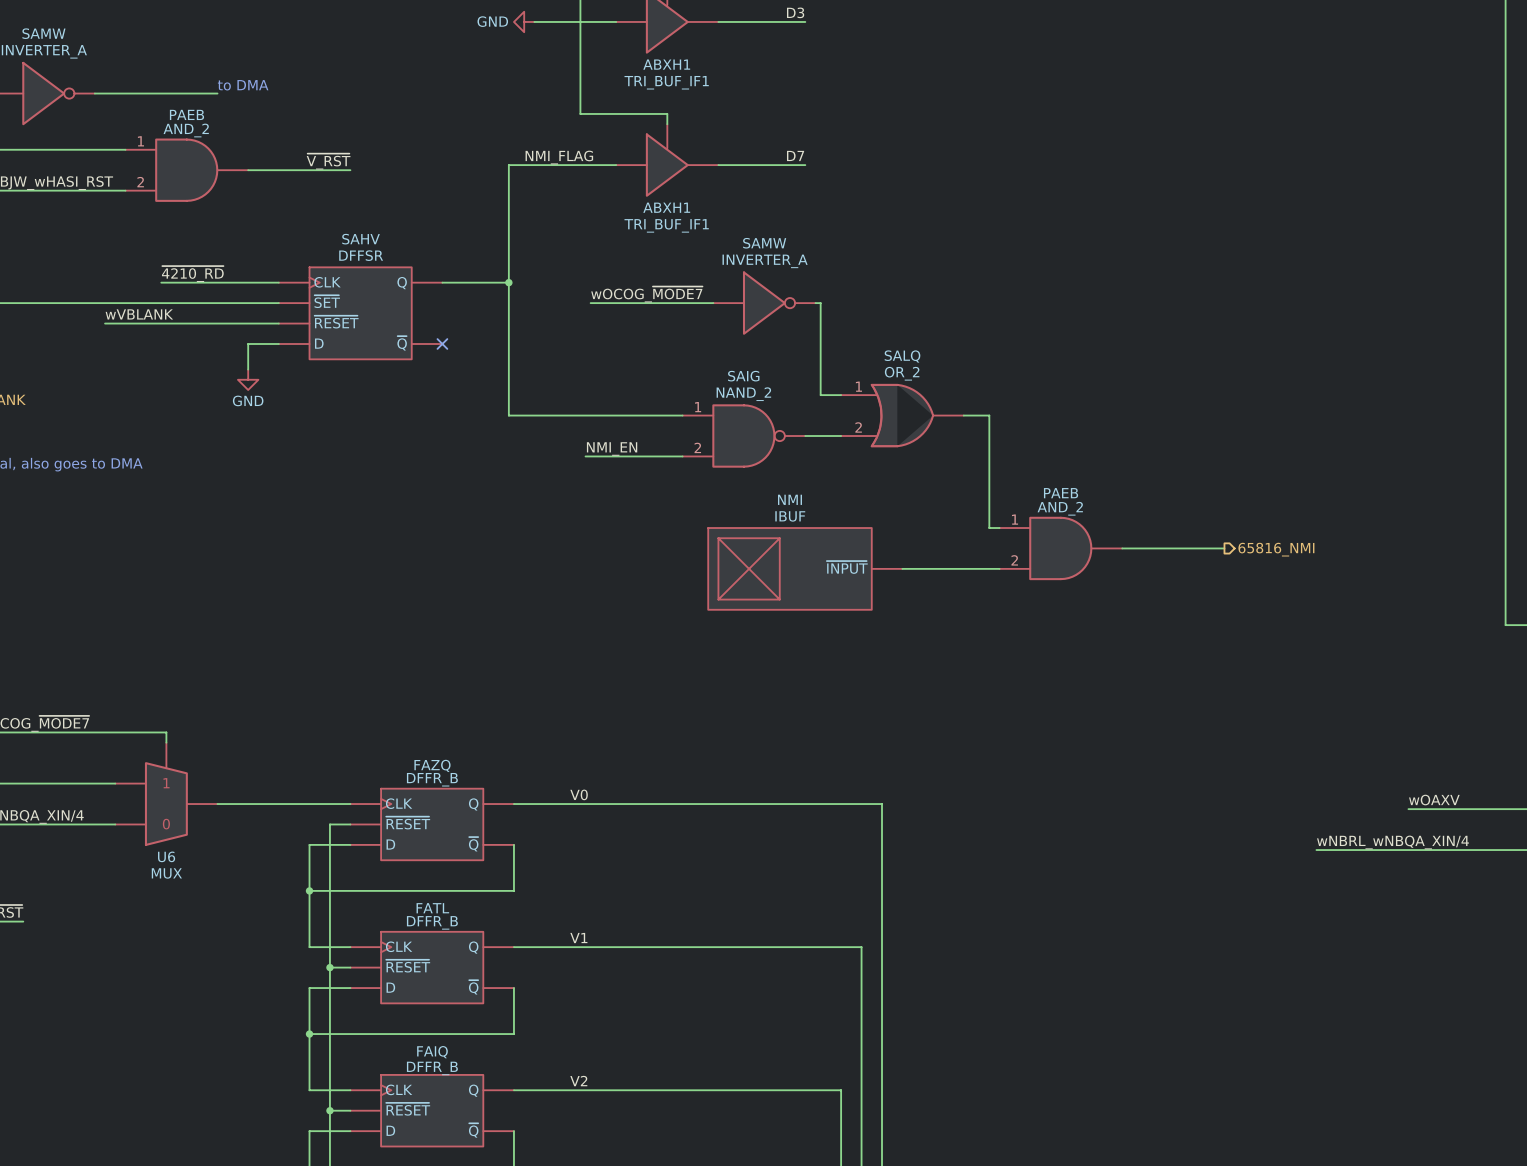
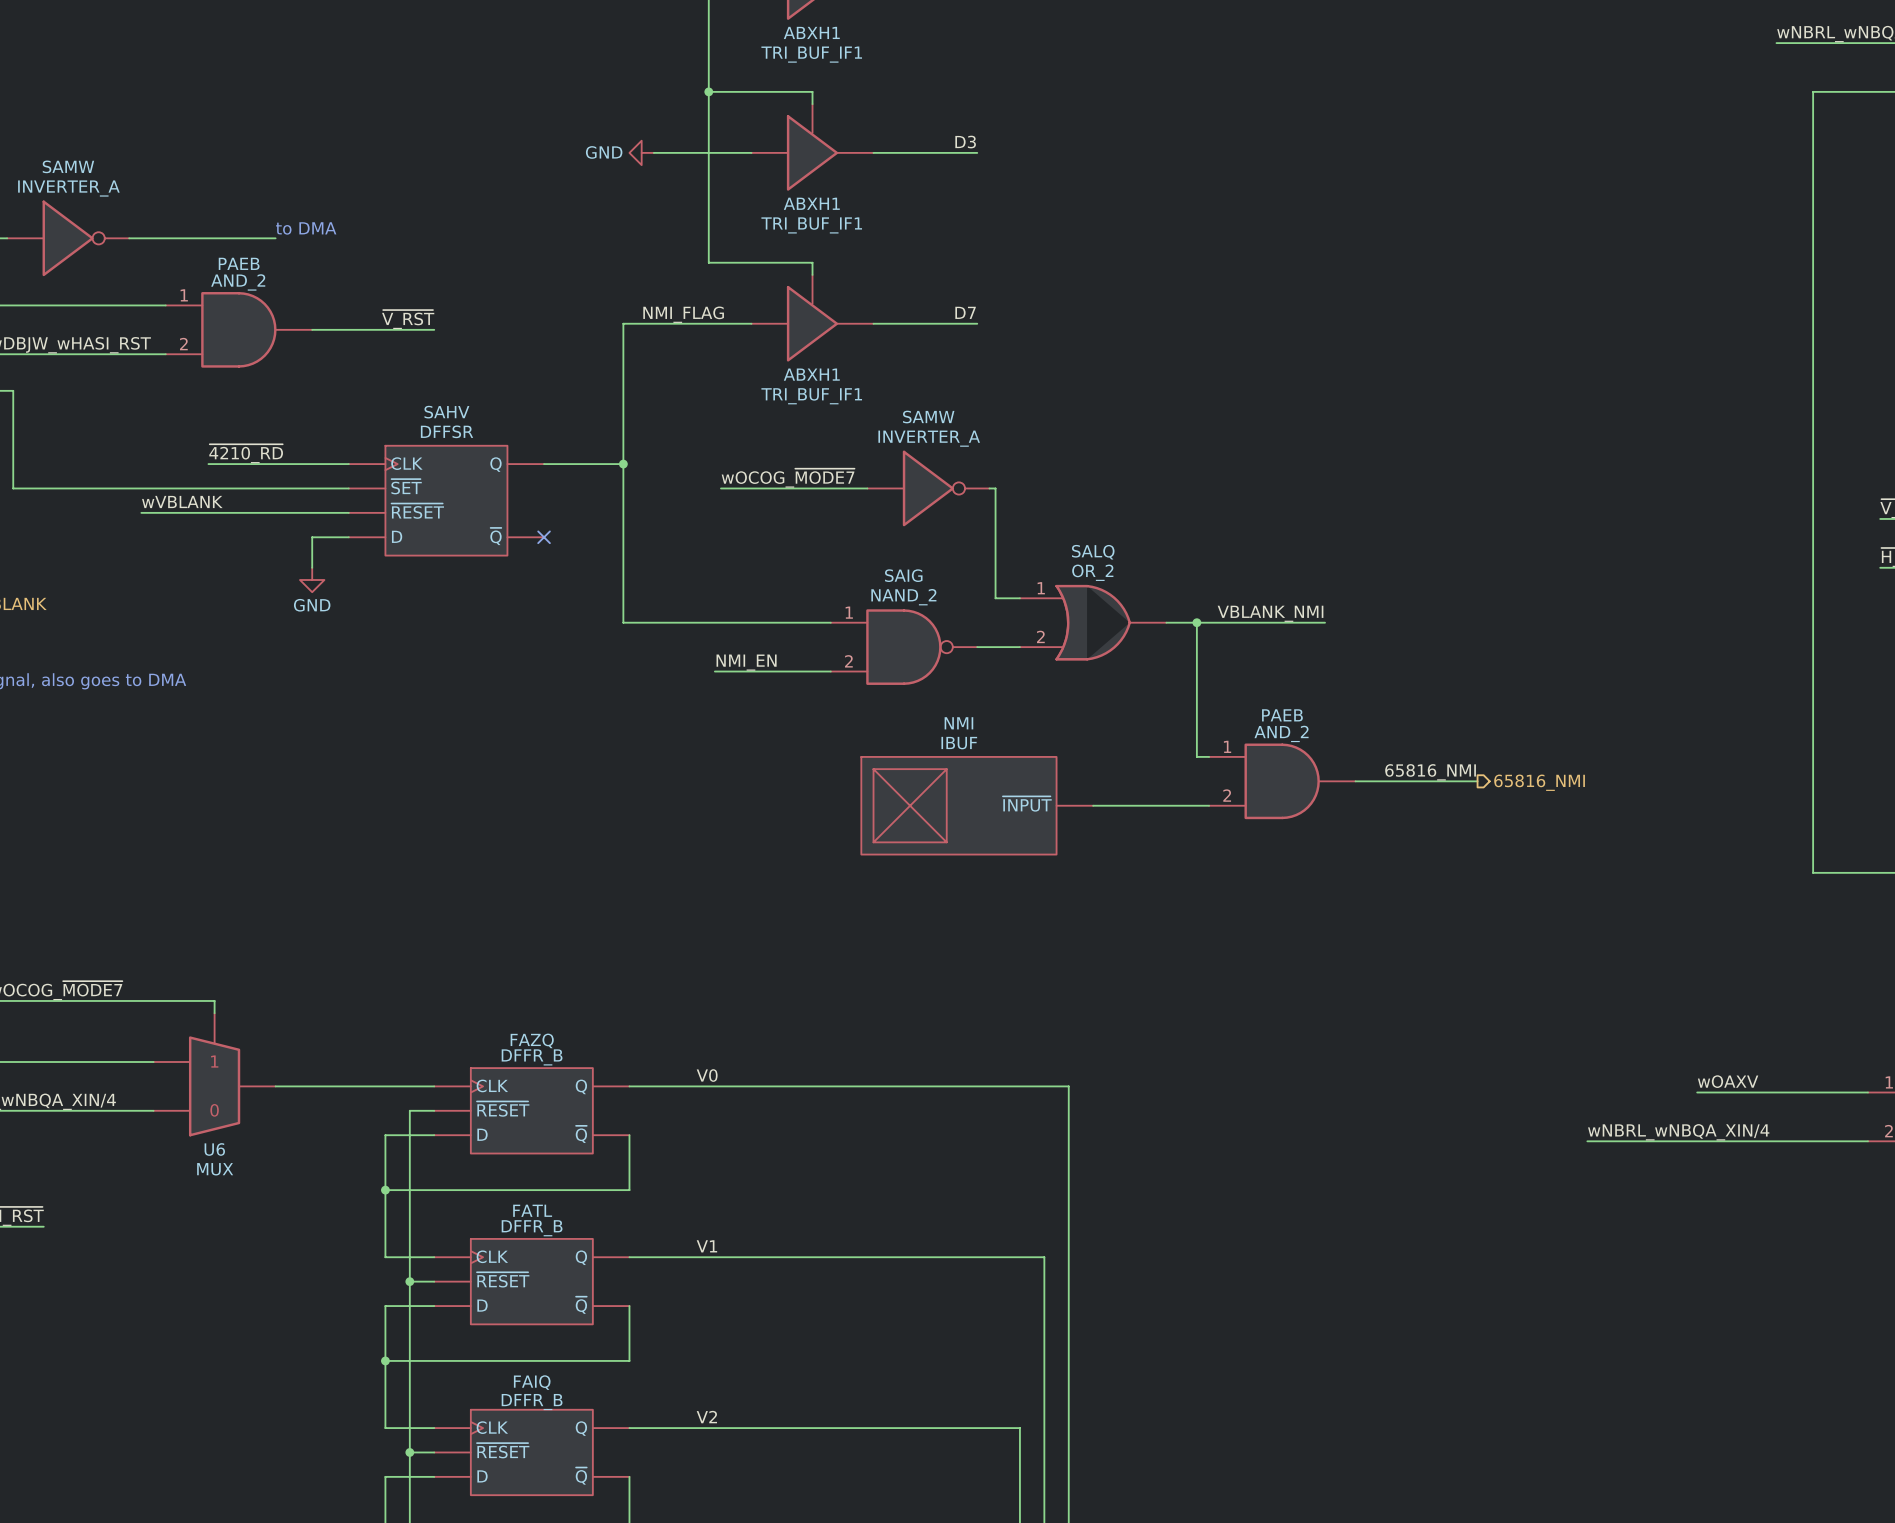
label: none -> VBLANK_NMI (1270, 613)
wire: none -> (1196, 622) (1325, 622)
junction: none -> (1196, 622)
label: none -> 65816_NMI (1430, 772)

